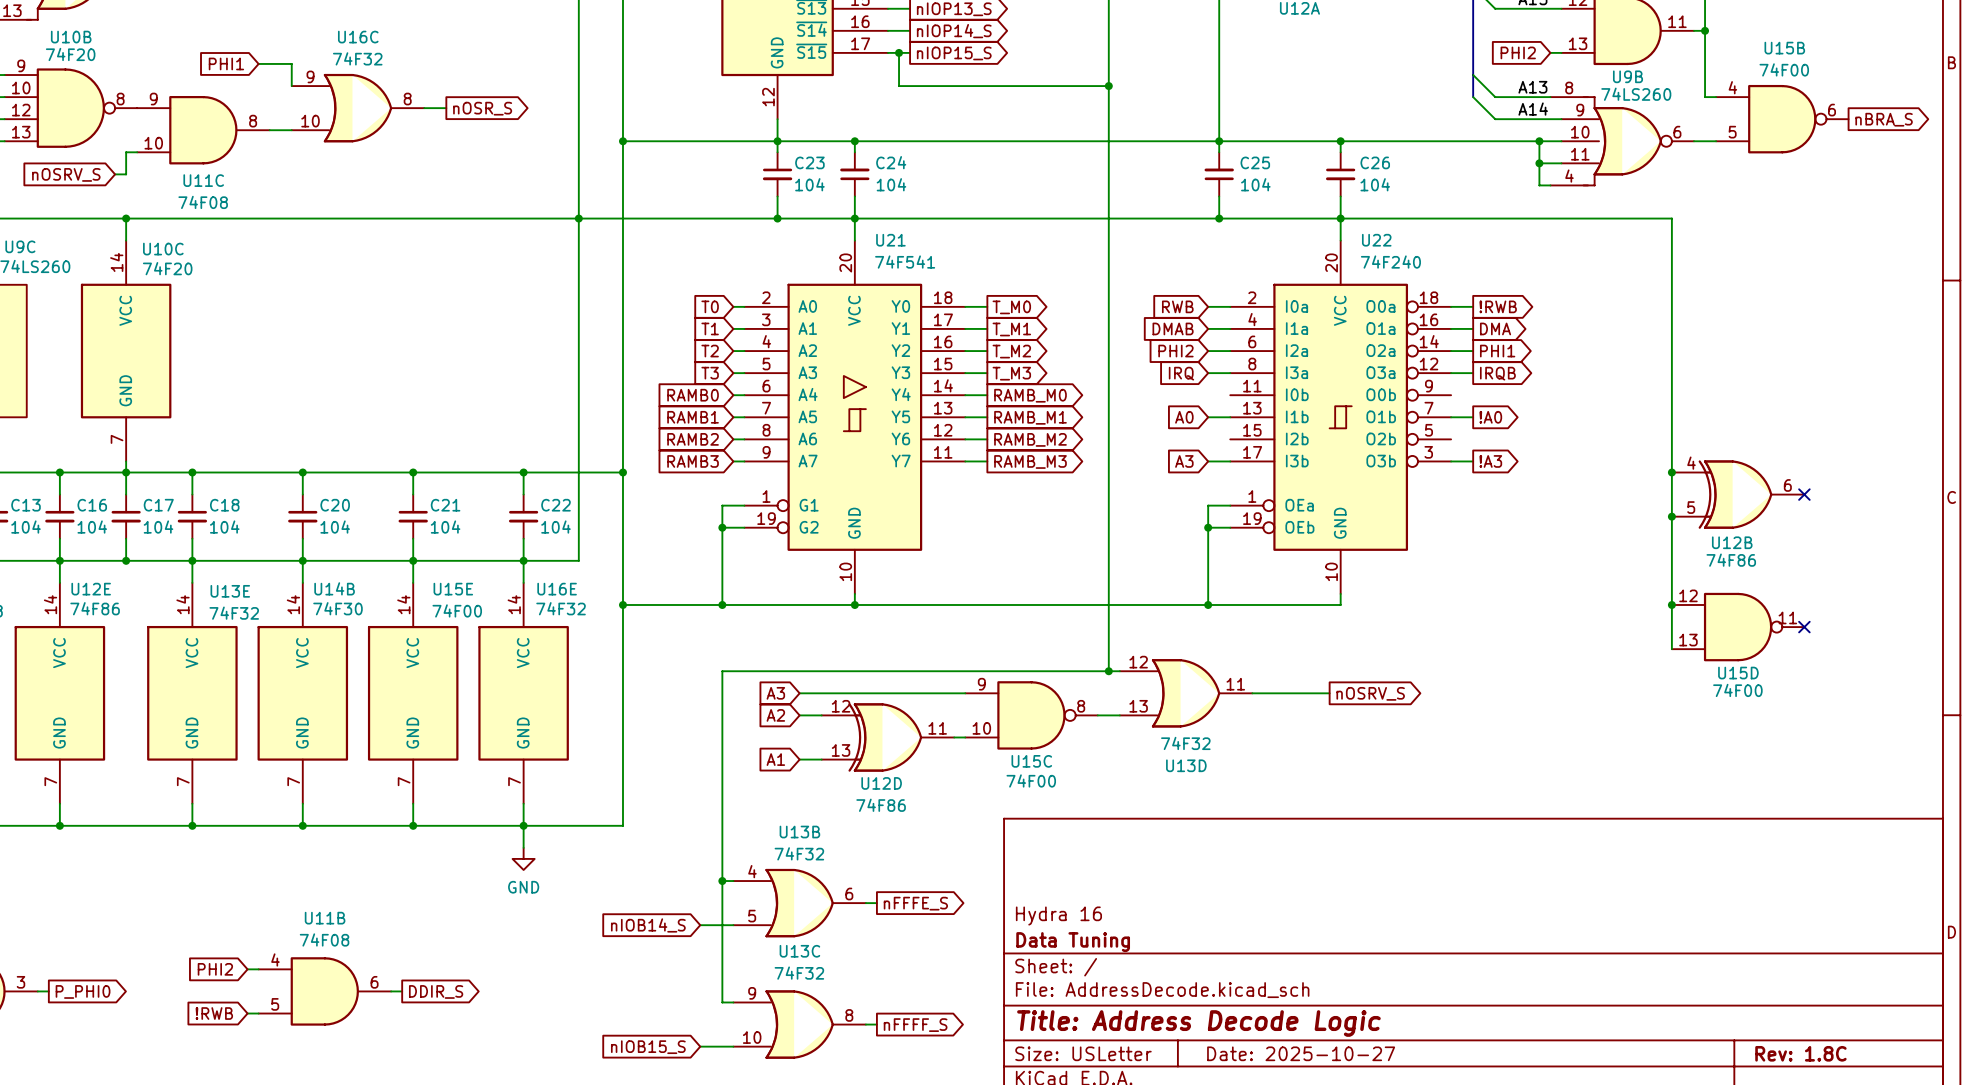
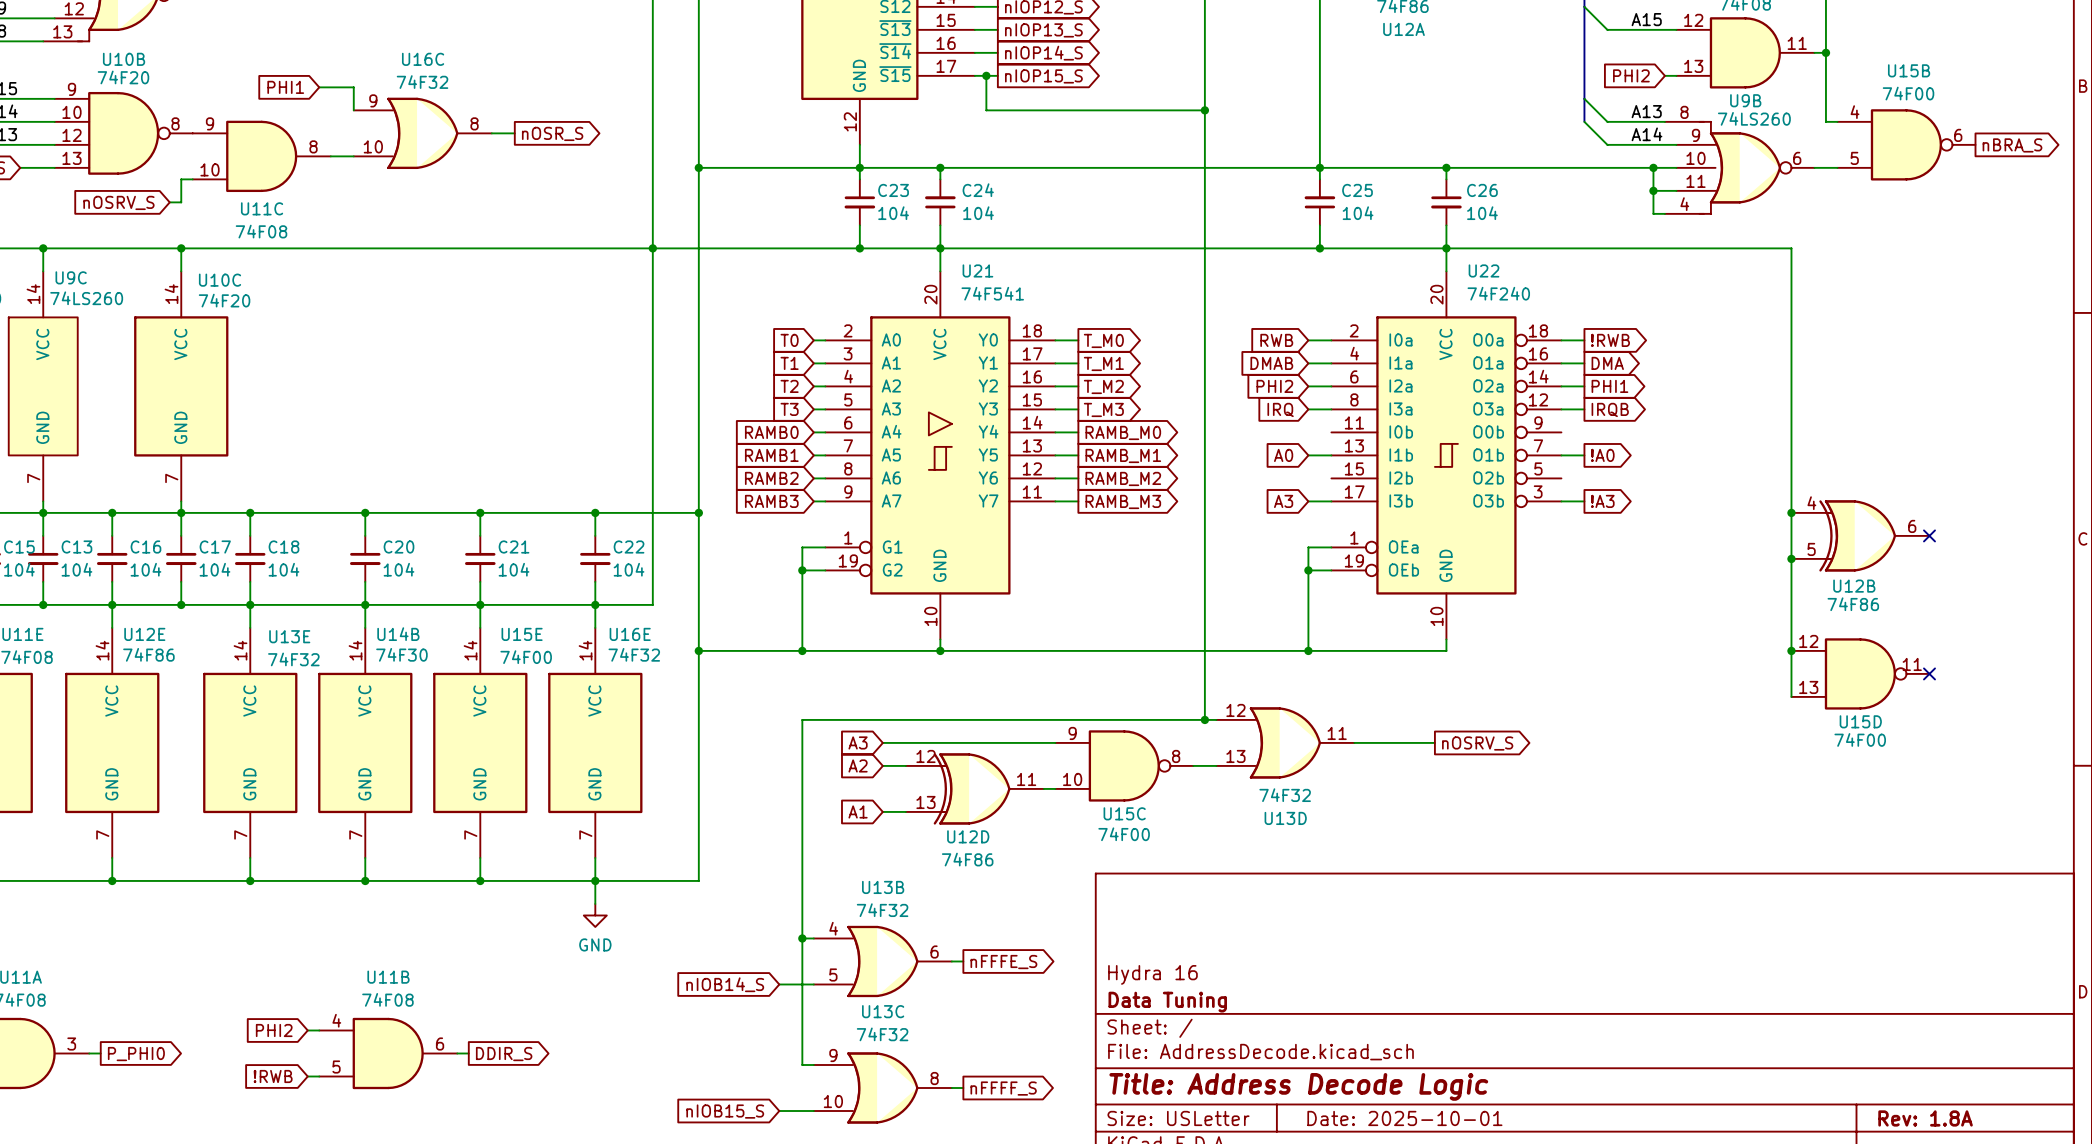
title block: Date: 2025-10-27 (1301, 1053) -> Date: 2025-10-01 (1404, 1118)
title block: Rev: 1.8C (1800, 1053) -> Rev: 1.8A (1925, 1118)

